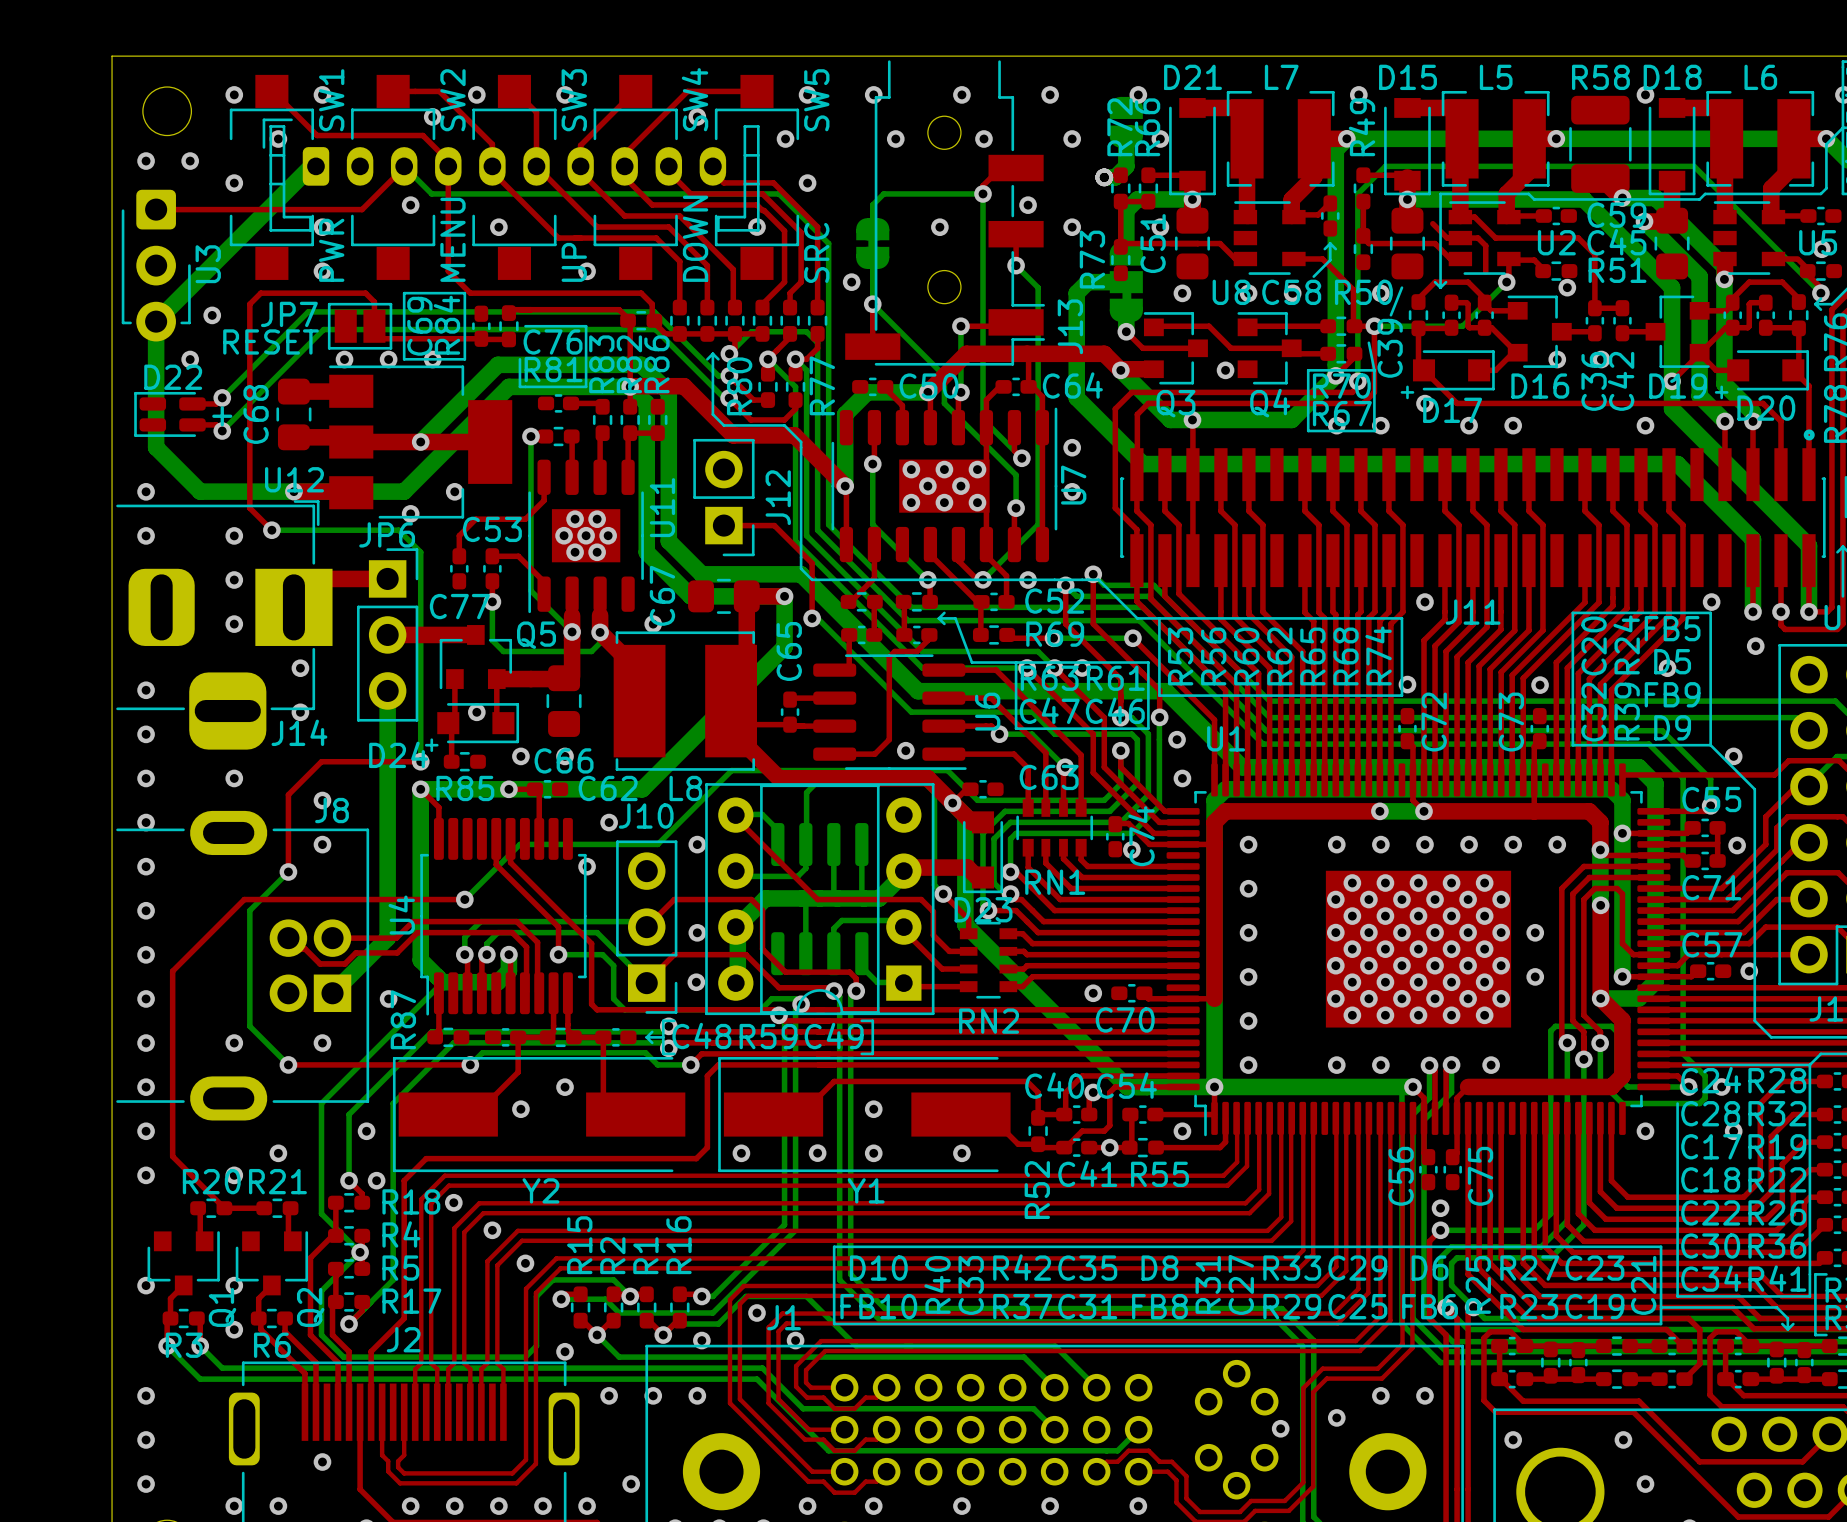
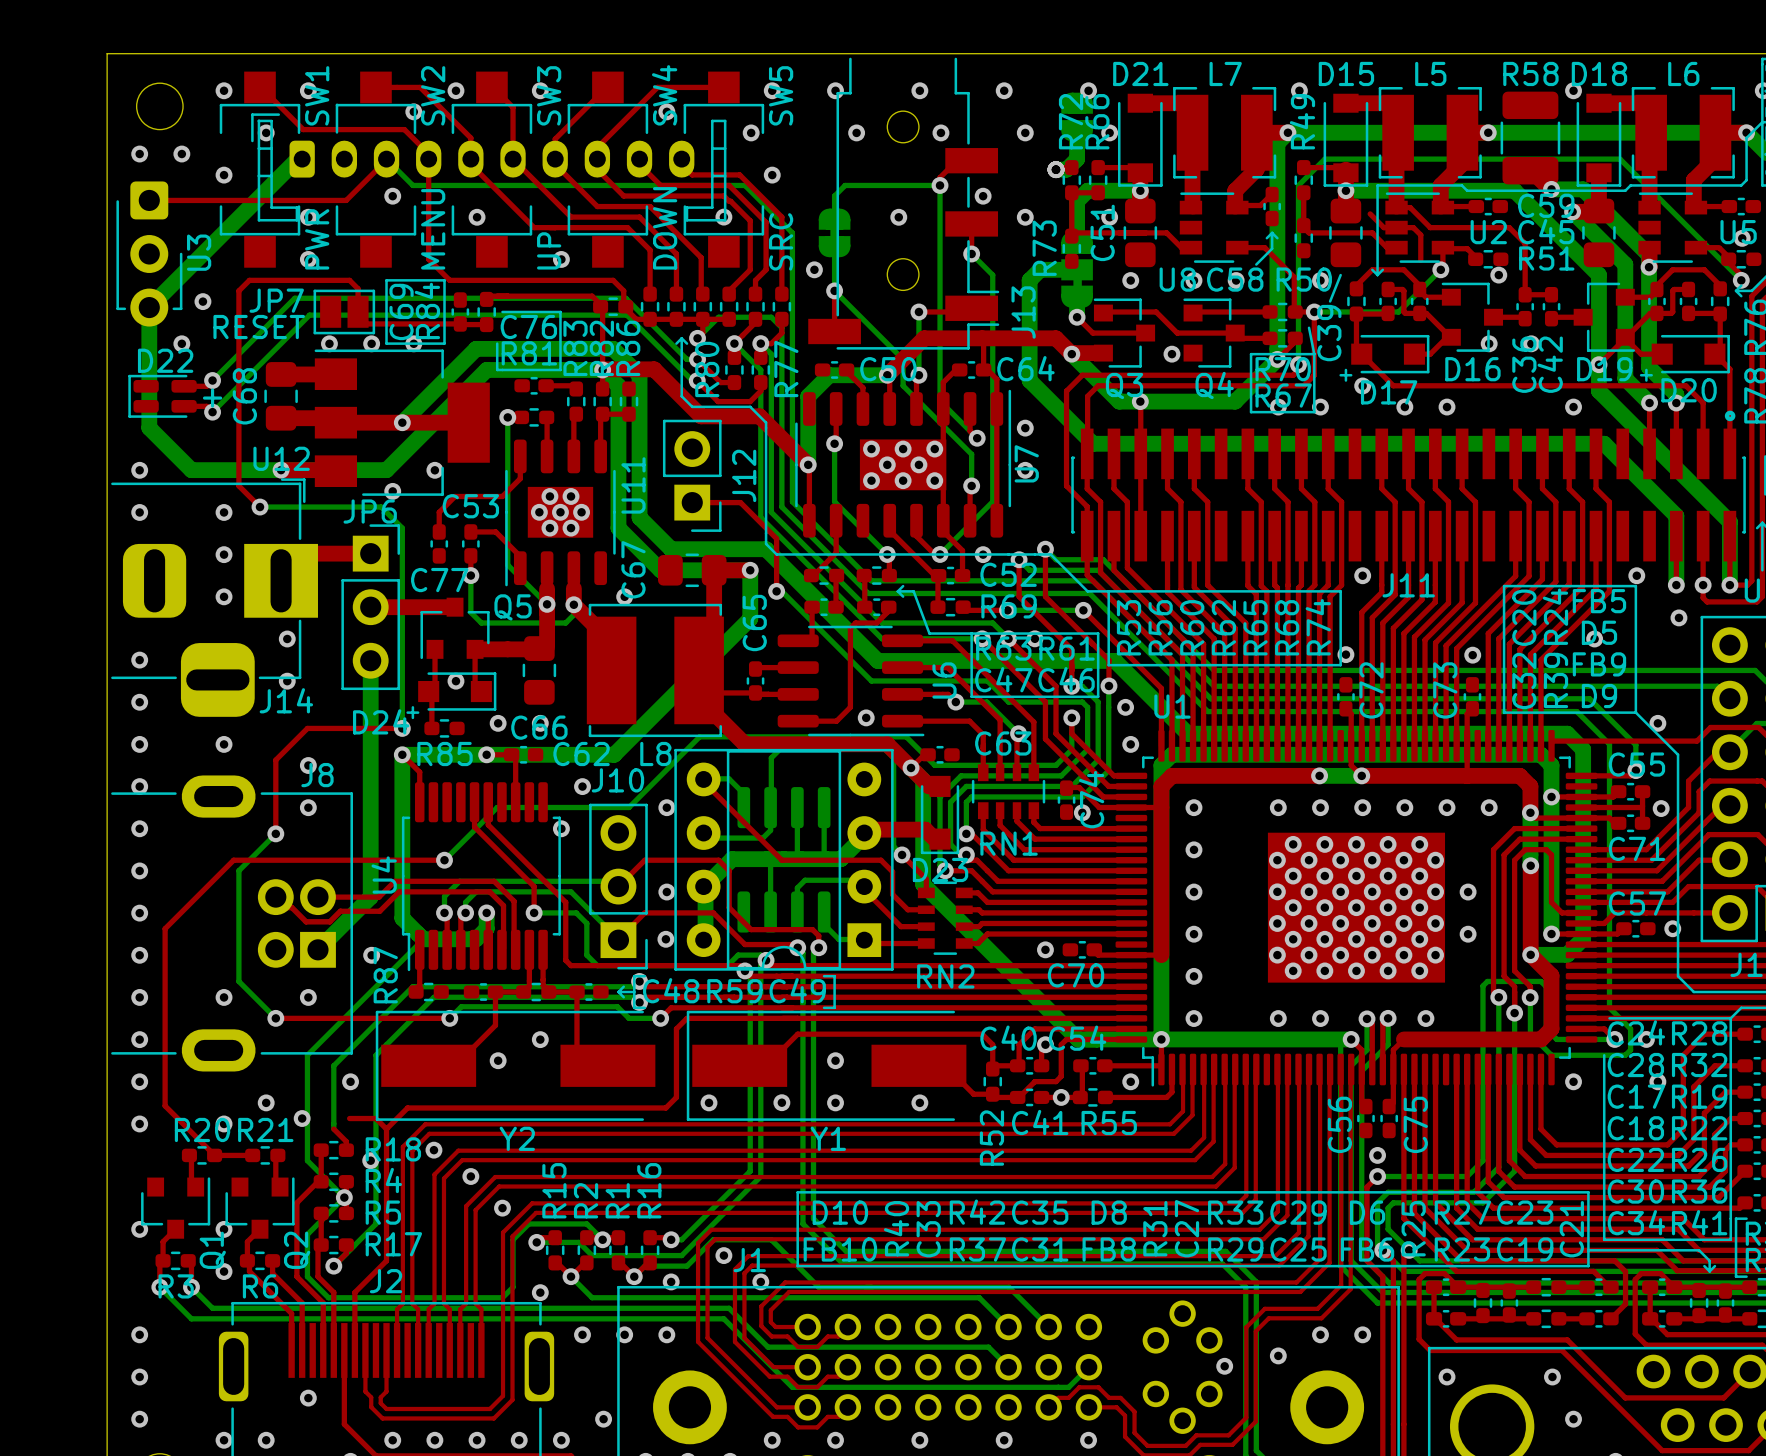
via: none -> (302, 1118)
top track: none -> (349, 1118) (375, 1118) (386, 1129)
via: (349, 1180) -> none
via: (376, 1180) -> none
via: none -> (370, 1160)

